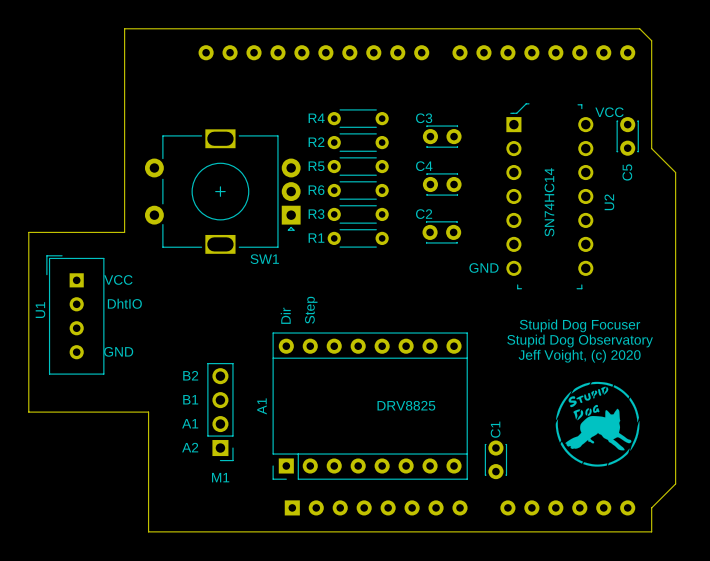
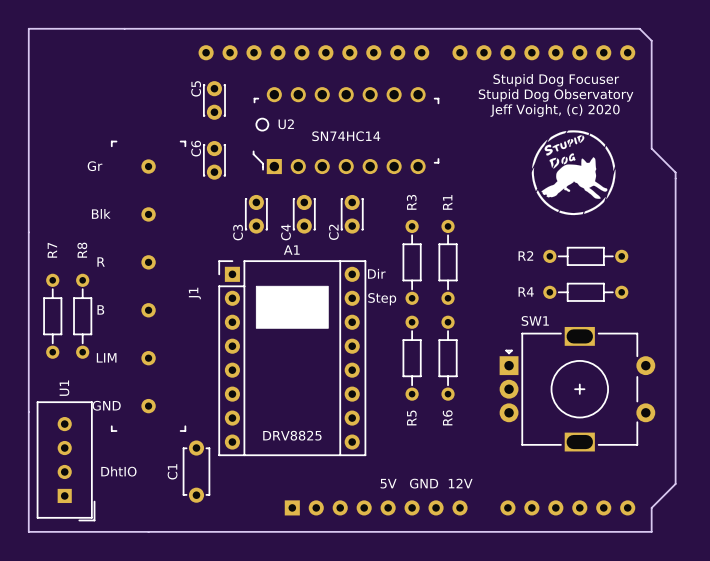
board edge: (124, 28) (124, 232) (28, 232) -> (124, 28) (28, 28) (28, 232)
text: none -> Stupid Dog Focuser (556, 80)
text: none -> Stupid Dog Observatory (556, 95)
R4 footprint: [327, 109, 389, 128] -> [543, 283, 629, 302]
text: none -> Jeff Voight, (c) 2020 (555, 110)
text: VCC (609, 112) -> none
drawing: none -> [255, 118, 269, 132]
C3 name position: C3 (424, 118) -> C3 (238, 232)
drawing: none -> [531, 130, 616, 216]
R2 footprint: [327, 133, 389, 152] -> [543, 247, 629, 266]
C3 rotation: 0° (442, 136) -> 90° clockwise (256, 214)
C3 position: (442, 136) -> (256, 214)
C5 position: (627, 136) -> (214, 100)
R5 footprint: [327, 157, 389, 176] -> [402, 315, 422, 401]
C6: none -> (214, 160)
text: none -> Gr (95, 166)
R5 name position: R5 (316, 166) -> R5 (411, 418)
C4 name position: C4 (424, 166) -> C4 (285, 232)
C5 name position: C5 (627, 172) -> C5 (196, 88)
R6 footprint: [327, 181, 389, 200] -> [438, 315, 458, 401]
C4 rotation: 0° (442, 184) -> 90° clockwise (304, 214)
C4 position: (442, 184) -> (304, 214)
R6 name position: R6 (316, 190) -> R6 (447, 417)
SW1 rotation: 0° (222, 191) -> 180° (577, 389)
SW1 position: (222, 191) -> (577, 389)
U2 rotation: 0° (549, 196) -> 90° counterclockwise (346, 130)
U2 position: (549, 196) -> (346, 130)
text rotation: 0° (549, 202) -> 90° clockwise (346, 136)
text position: SN74HC14 (549, 202) -> SN74HC14 (346, 136)
U2 name position: U2 (609, 202) -> U2 (286, 124)
R3 footprint: [327, 205, 389, 224] -> [402, 219, 422, 305]
text: none -> Blk (101, 213)
R3 name position: R3 (316, 214) -> R3 (411, 202)
C2 name position: C2 (424, 214) -> C2 (333, 232)
R1 footprint: [327, 229, 389, 248] -> [438, 219, 458, 305]
C2 rotation: 0° (441, 232) -> 90° clockwise (352, 214)
C2 position: (441, 232) -> (352, 214)
R1 name position: R1 (316, 238) -> R1 (447, 202)
text: none -> R (101, 262)
text: GND (483, 267) -> none
text: VCC (118, 279) -> none
drawing: none -> [255, 285, 329, 329]
J1: none -> (148, 286)
text position: DhtIO (124, 303) -> DhtIO (118, 471)
text: none -> B (100, 309)
U1 name position: U1 (40, 310) -> U1 (64, 388)
text rotation: 0° (311, 310) -> 90° clockwise (382, 299)
text position: Step (311, 310) -> Step (382, 299)
U1 rotation: 0° (75, 314) -> 180° (66, 461)
U1 position: (75, 314) -> (66, 461)
text rotation: 0° (285, 315) -> 90° clockwise (376, 273)
text position: Dir (285, 315) -> Dir (376, 273)
R7: none -> (52, 316)
R8: none -> (82, 316)
text: Stupid Dog Focuser (579, 325) -> none
text: Stupid Dog Observatory (580, 341) -> none
text position: GND (118, 351) -> GND (106, 405)
text: Jeff Voight, (c) 2020 (579, 356) -> none
text: none -> LIM (106, 357)
text: B2 (190, 375) -> none
drawing: [555, 381, 640, 467] -> none
text: B1 (190, 399) -> none
text position: DRV8825 (406, 405) -> DRV8825 (292, 435)
A1 rotation: 0° (370, 406) -> 90° clockwise (292, 358)
board edge: (28, 412) (148, 412) (148, 531) -> (28, 412) (28, 531) (148, 531)
M1: (220, 412) -> none
text: A1 (190, 423) -> none
C1 name position: C1 (495, 429) -> C1 (172, 471)
C1 footprint: [484, 440, 508, 480] -> [182, 440, 210, 503]
text: A2 (190, 447) -> none
text: none -> 5V (388, 483)
text: none -> GND (424, 483)
text: none -> 12V (460, 483)

